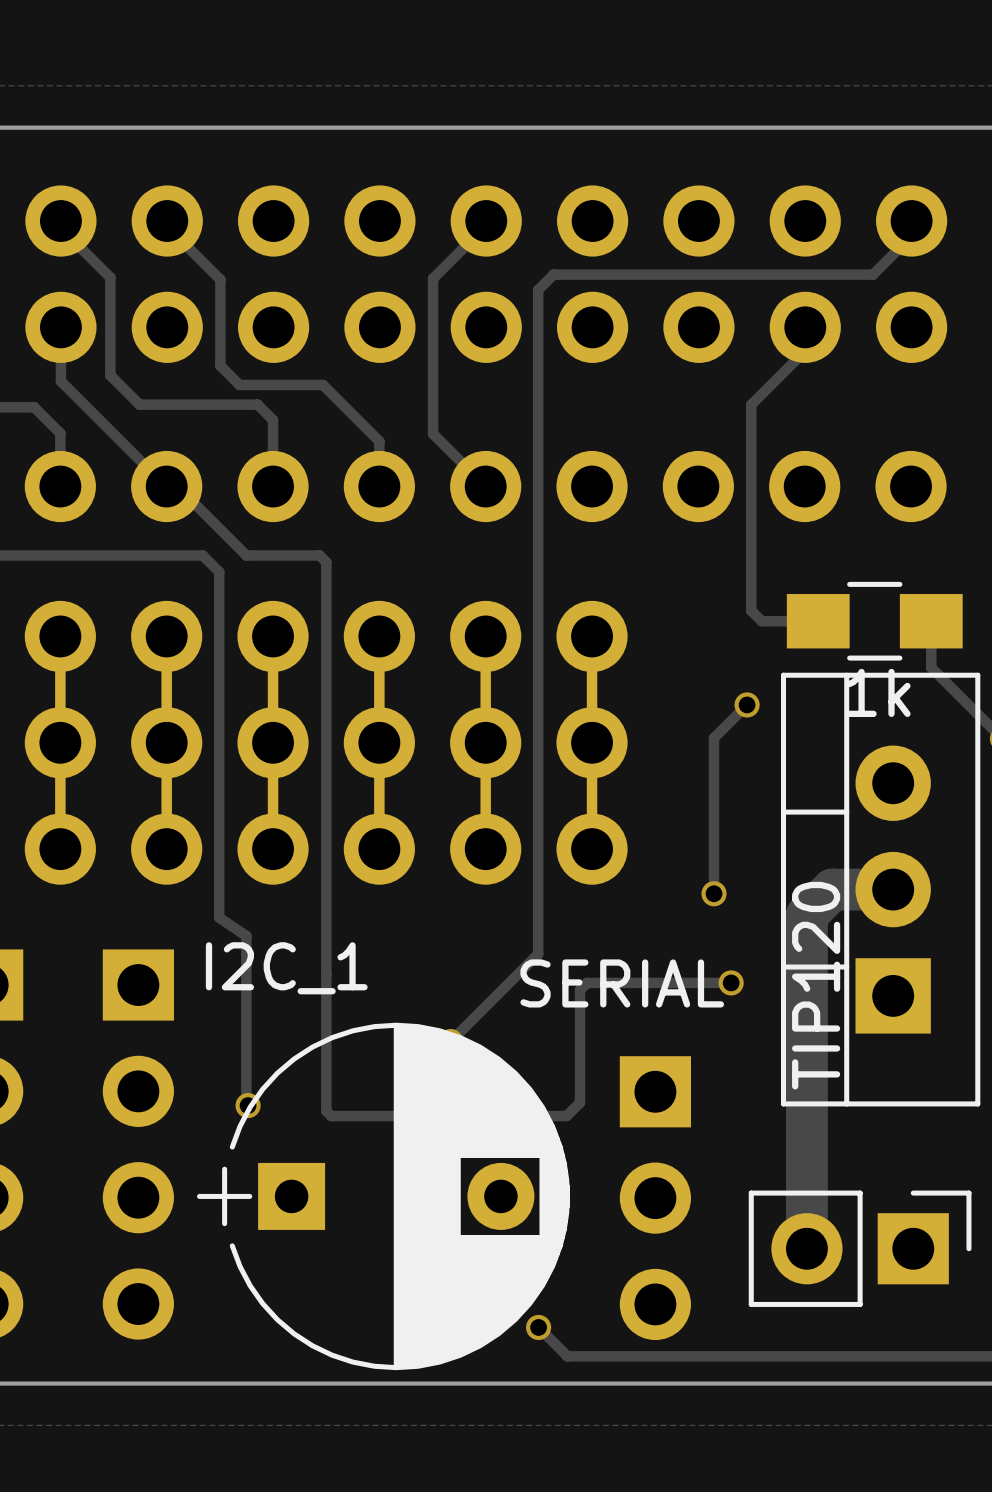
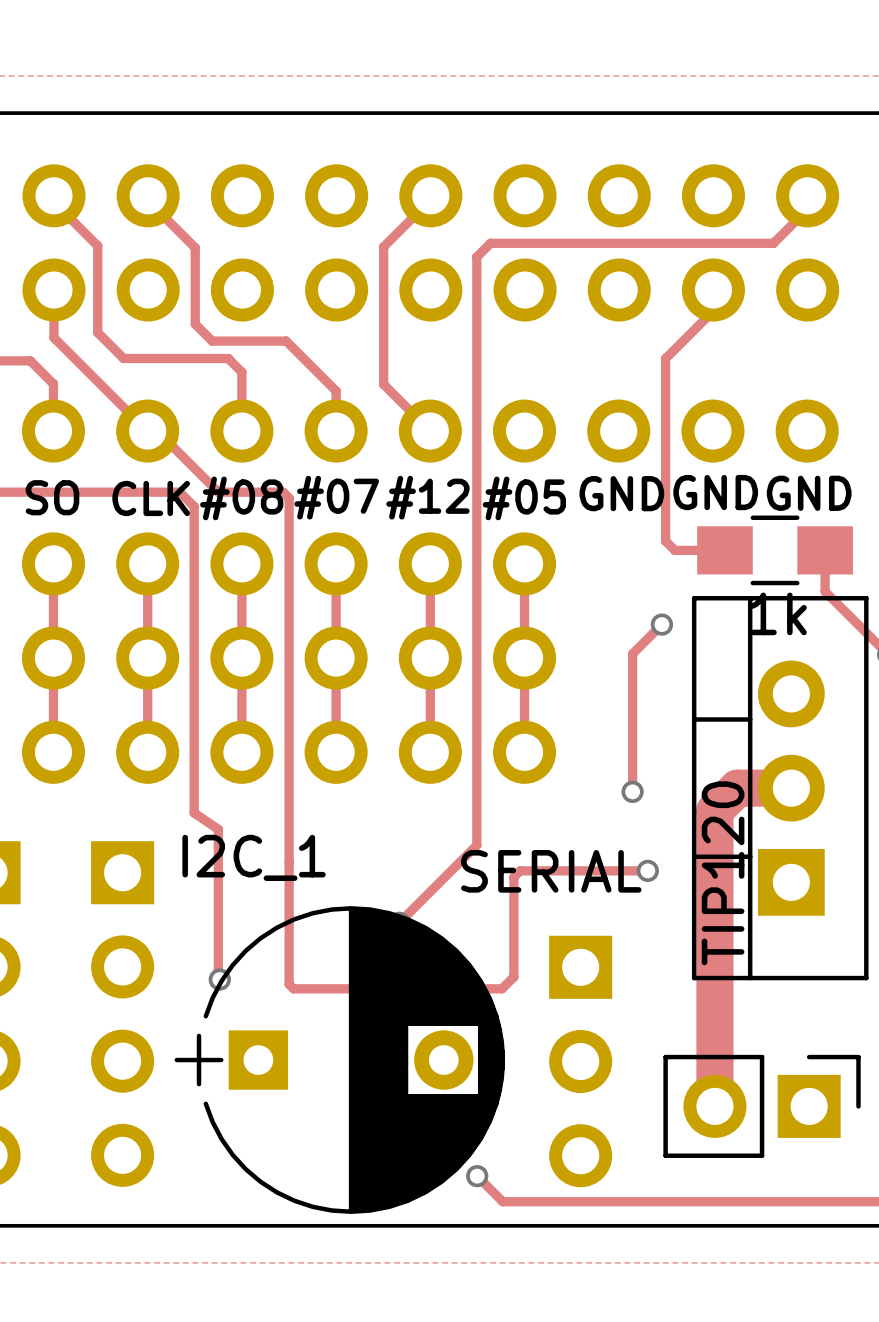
text: none -> GND (715, 492)
text: none -> GND (809, 493)
text: none -> GND (621, 493)
text: none -> SO (52, 497)
text: none -> #07 (336, 497)
text: none -> #12 (427, 497)
text: none -> CLK (151, 498)
text: none -> #08 (241, 498)
text: none -> #05 (524, 498)

